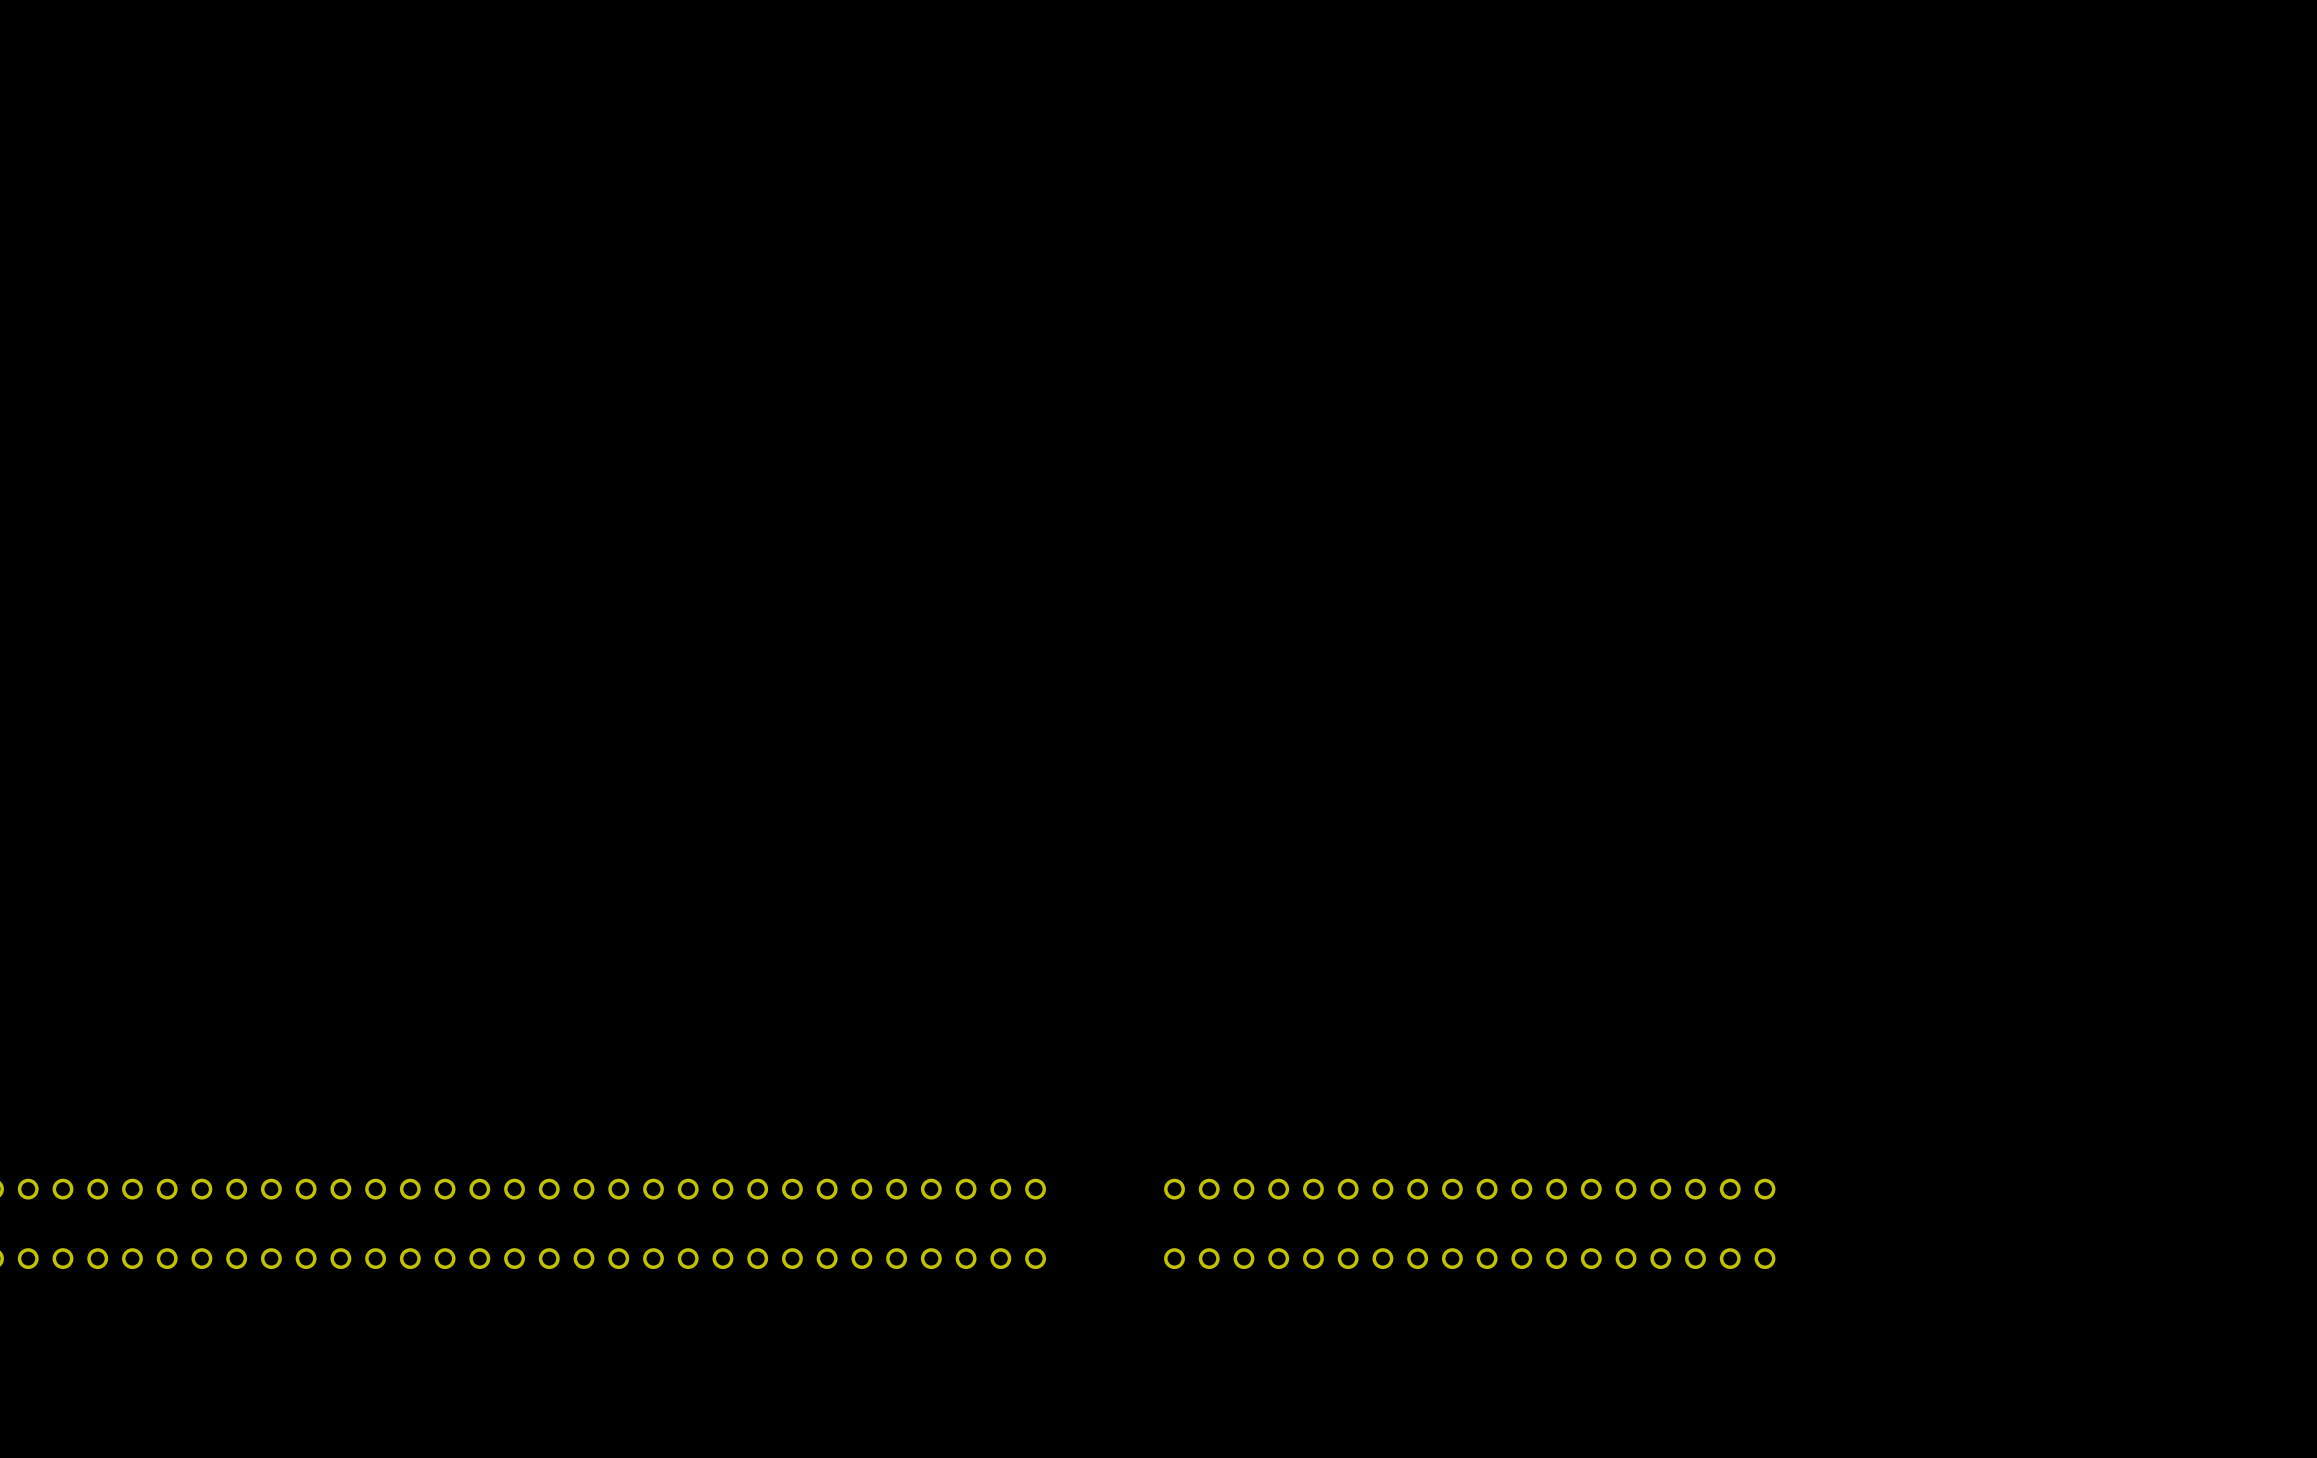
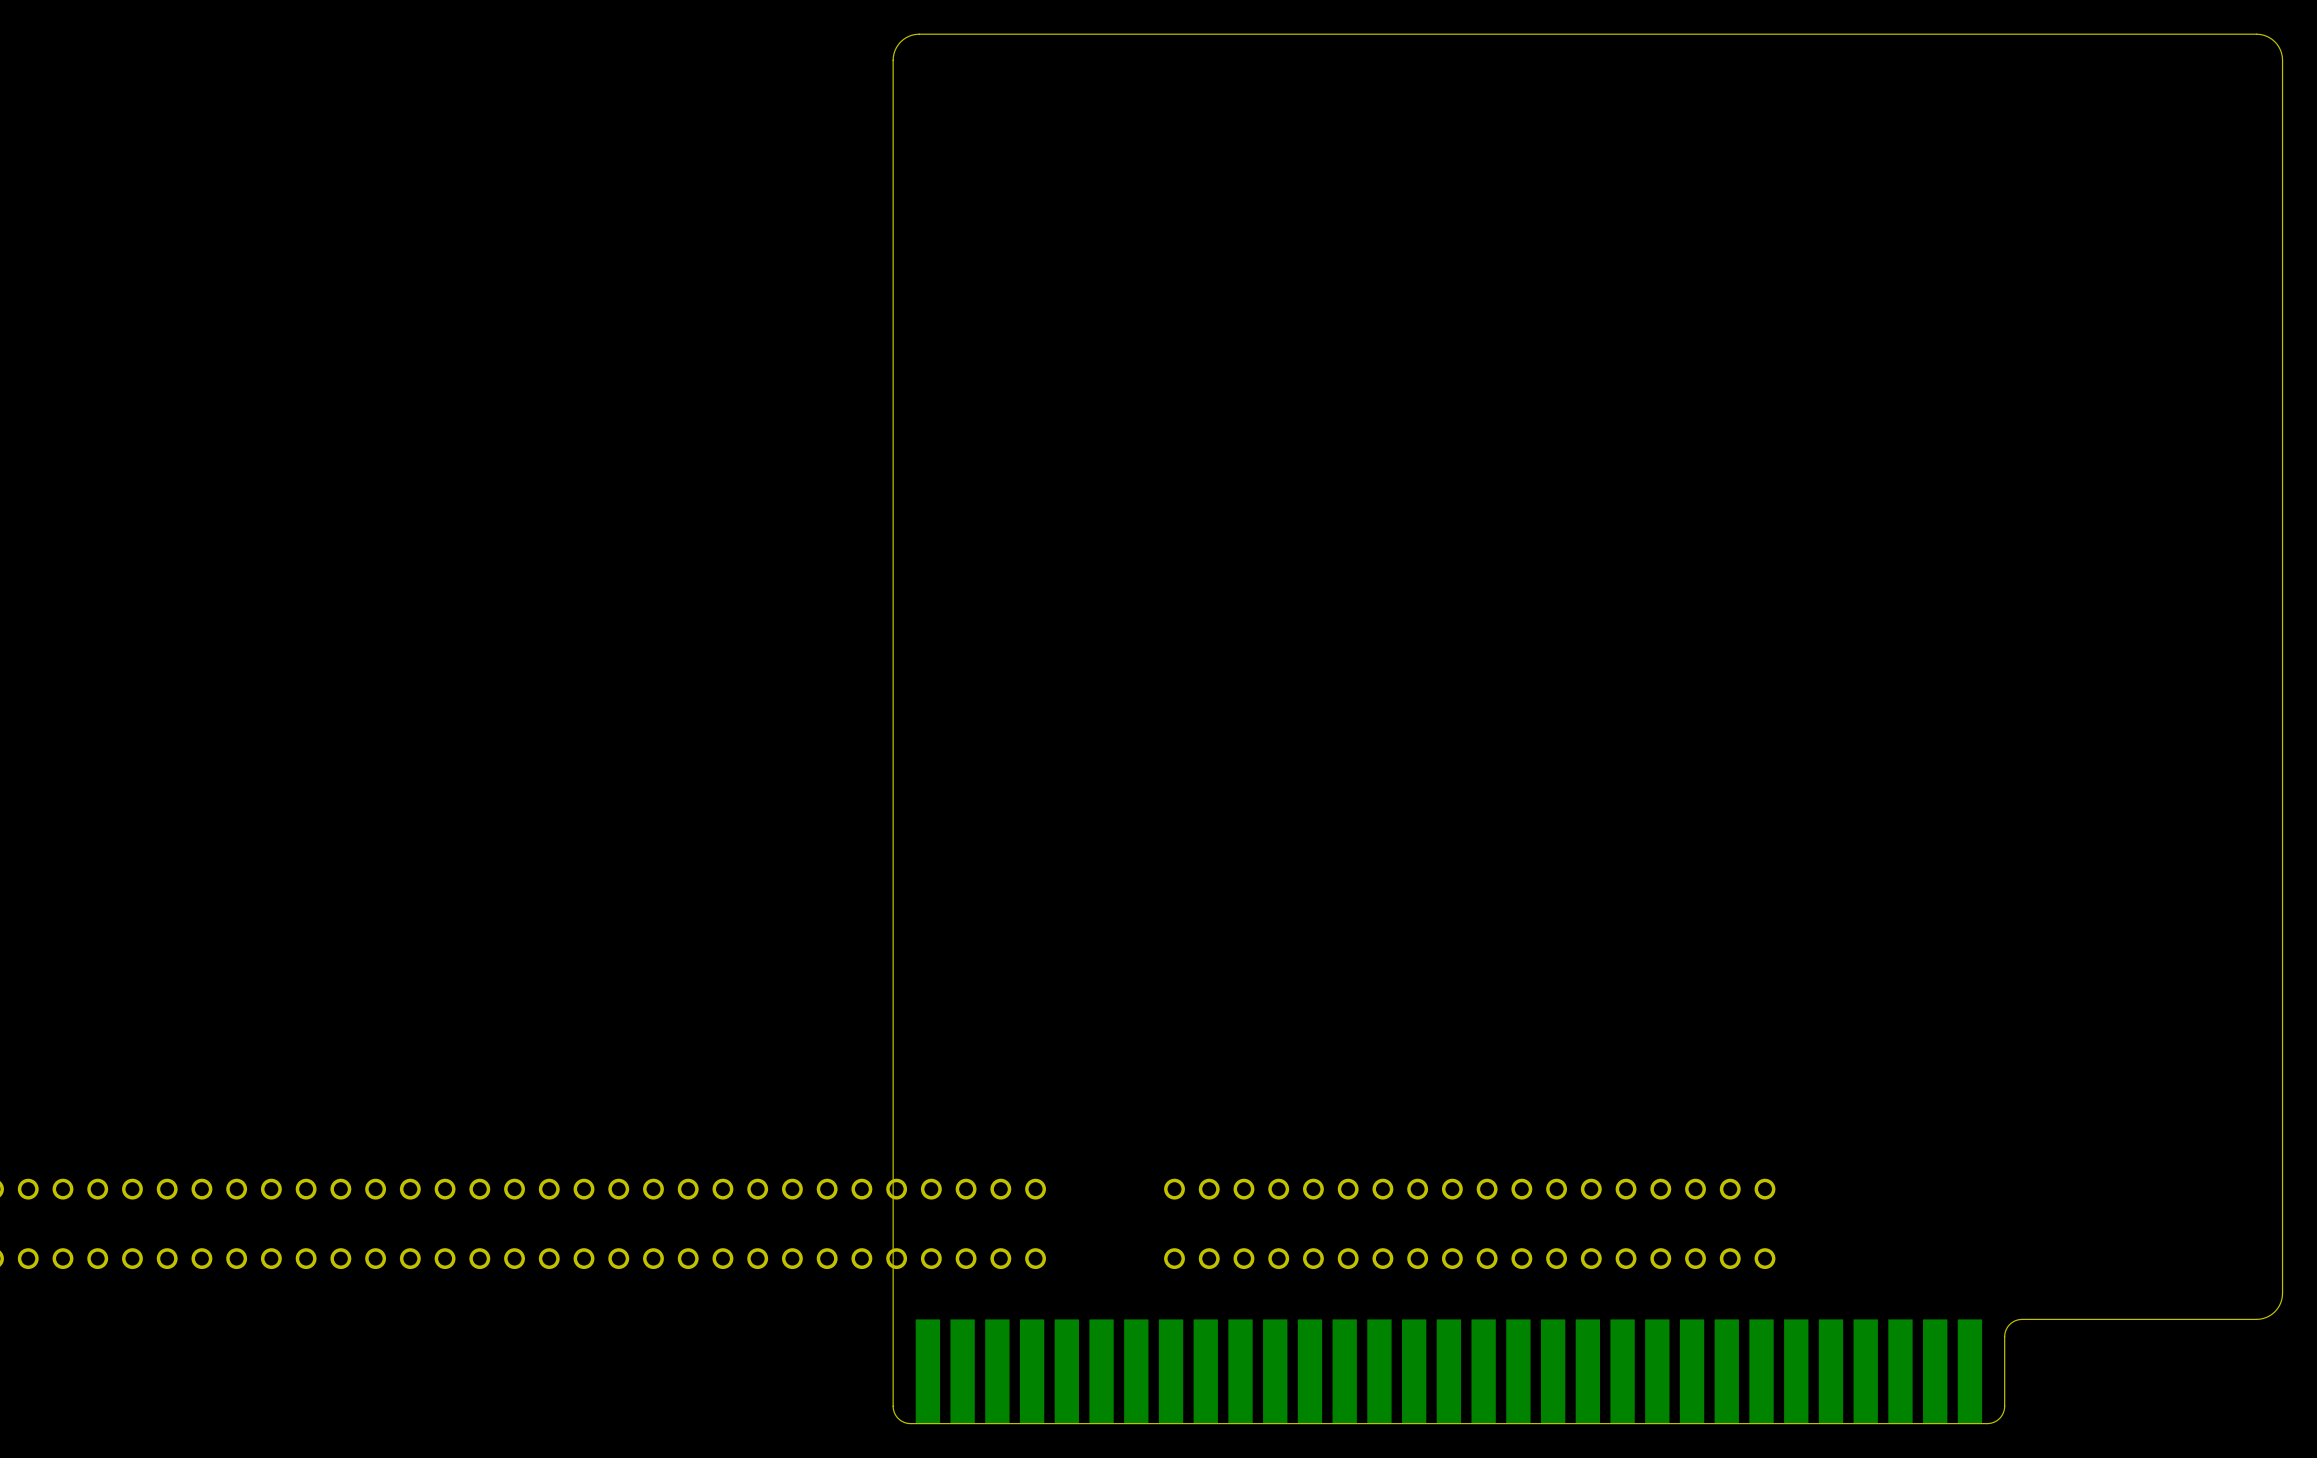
board edge: none -> (2256, 1319) (2022, 1319)
board edge: none -> (2256, 1319) (2266, 1317) (2274, 1311) (2280, 1303) (2282, 1293) (2282, 60) (2280, 50) (2274, 41) (2266, 36) (2256, 34) (919, 34) (903, 39) (896, 47) (893, 60) (893, 1406) (896, 1416) (901, 1421) (910, 1423) (1989, 1423) (1999, 1418) (2004, 1408) (2005, 1332) (2011, 1322) (2022, 1319)
part: none -> (1448, 1371)

